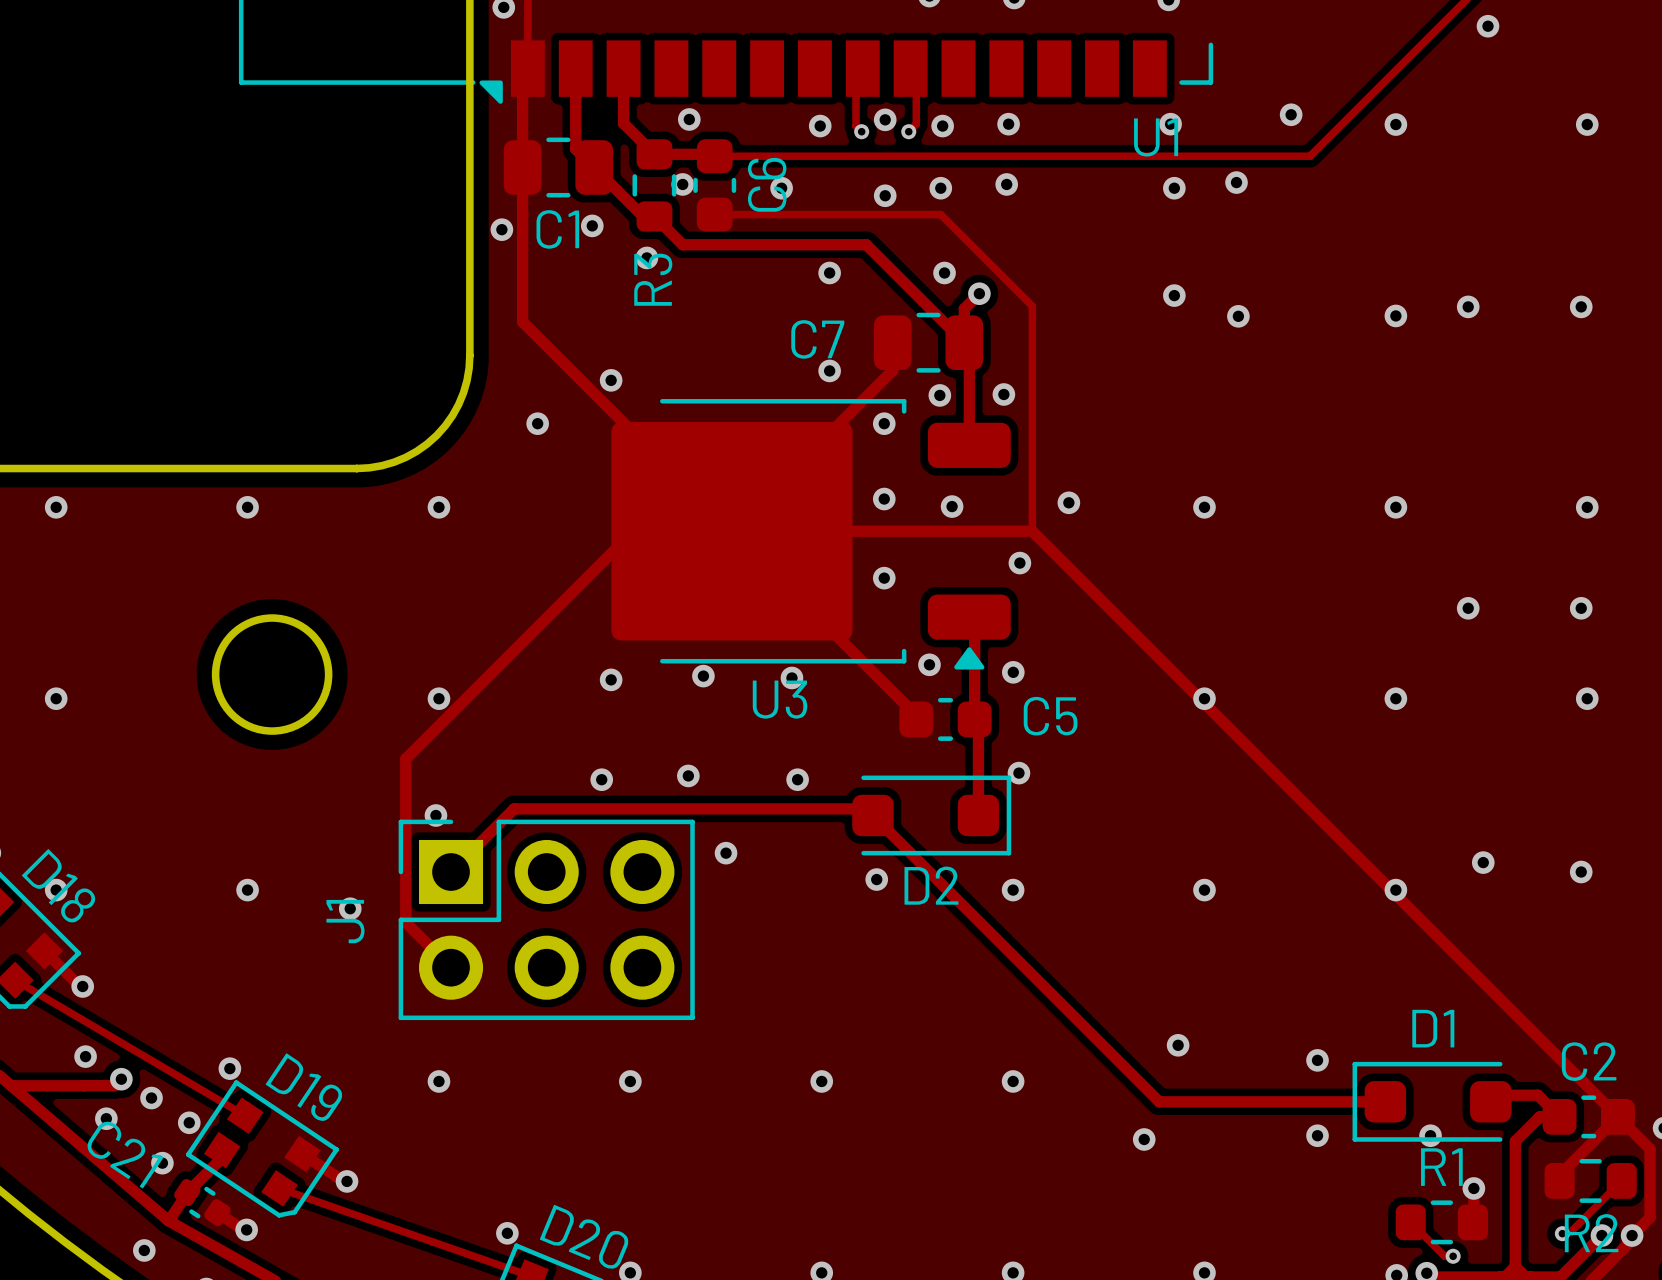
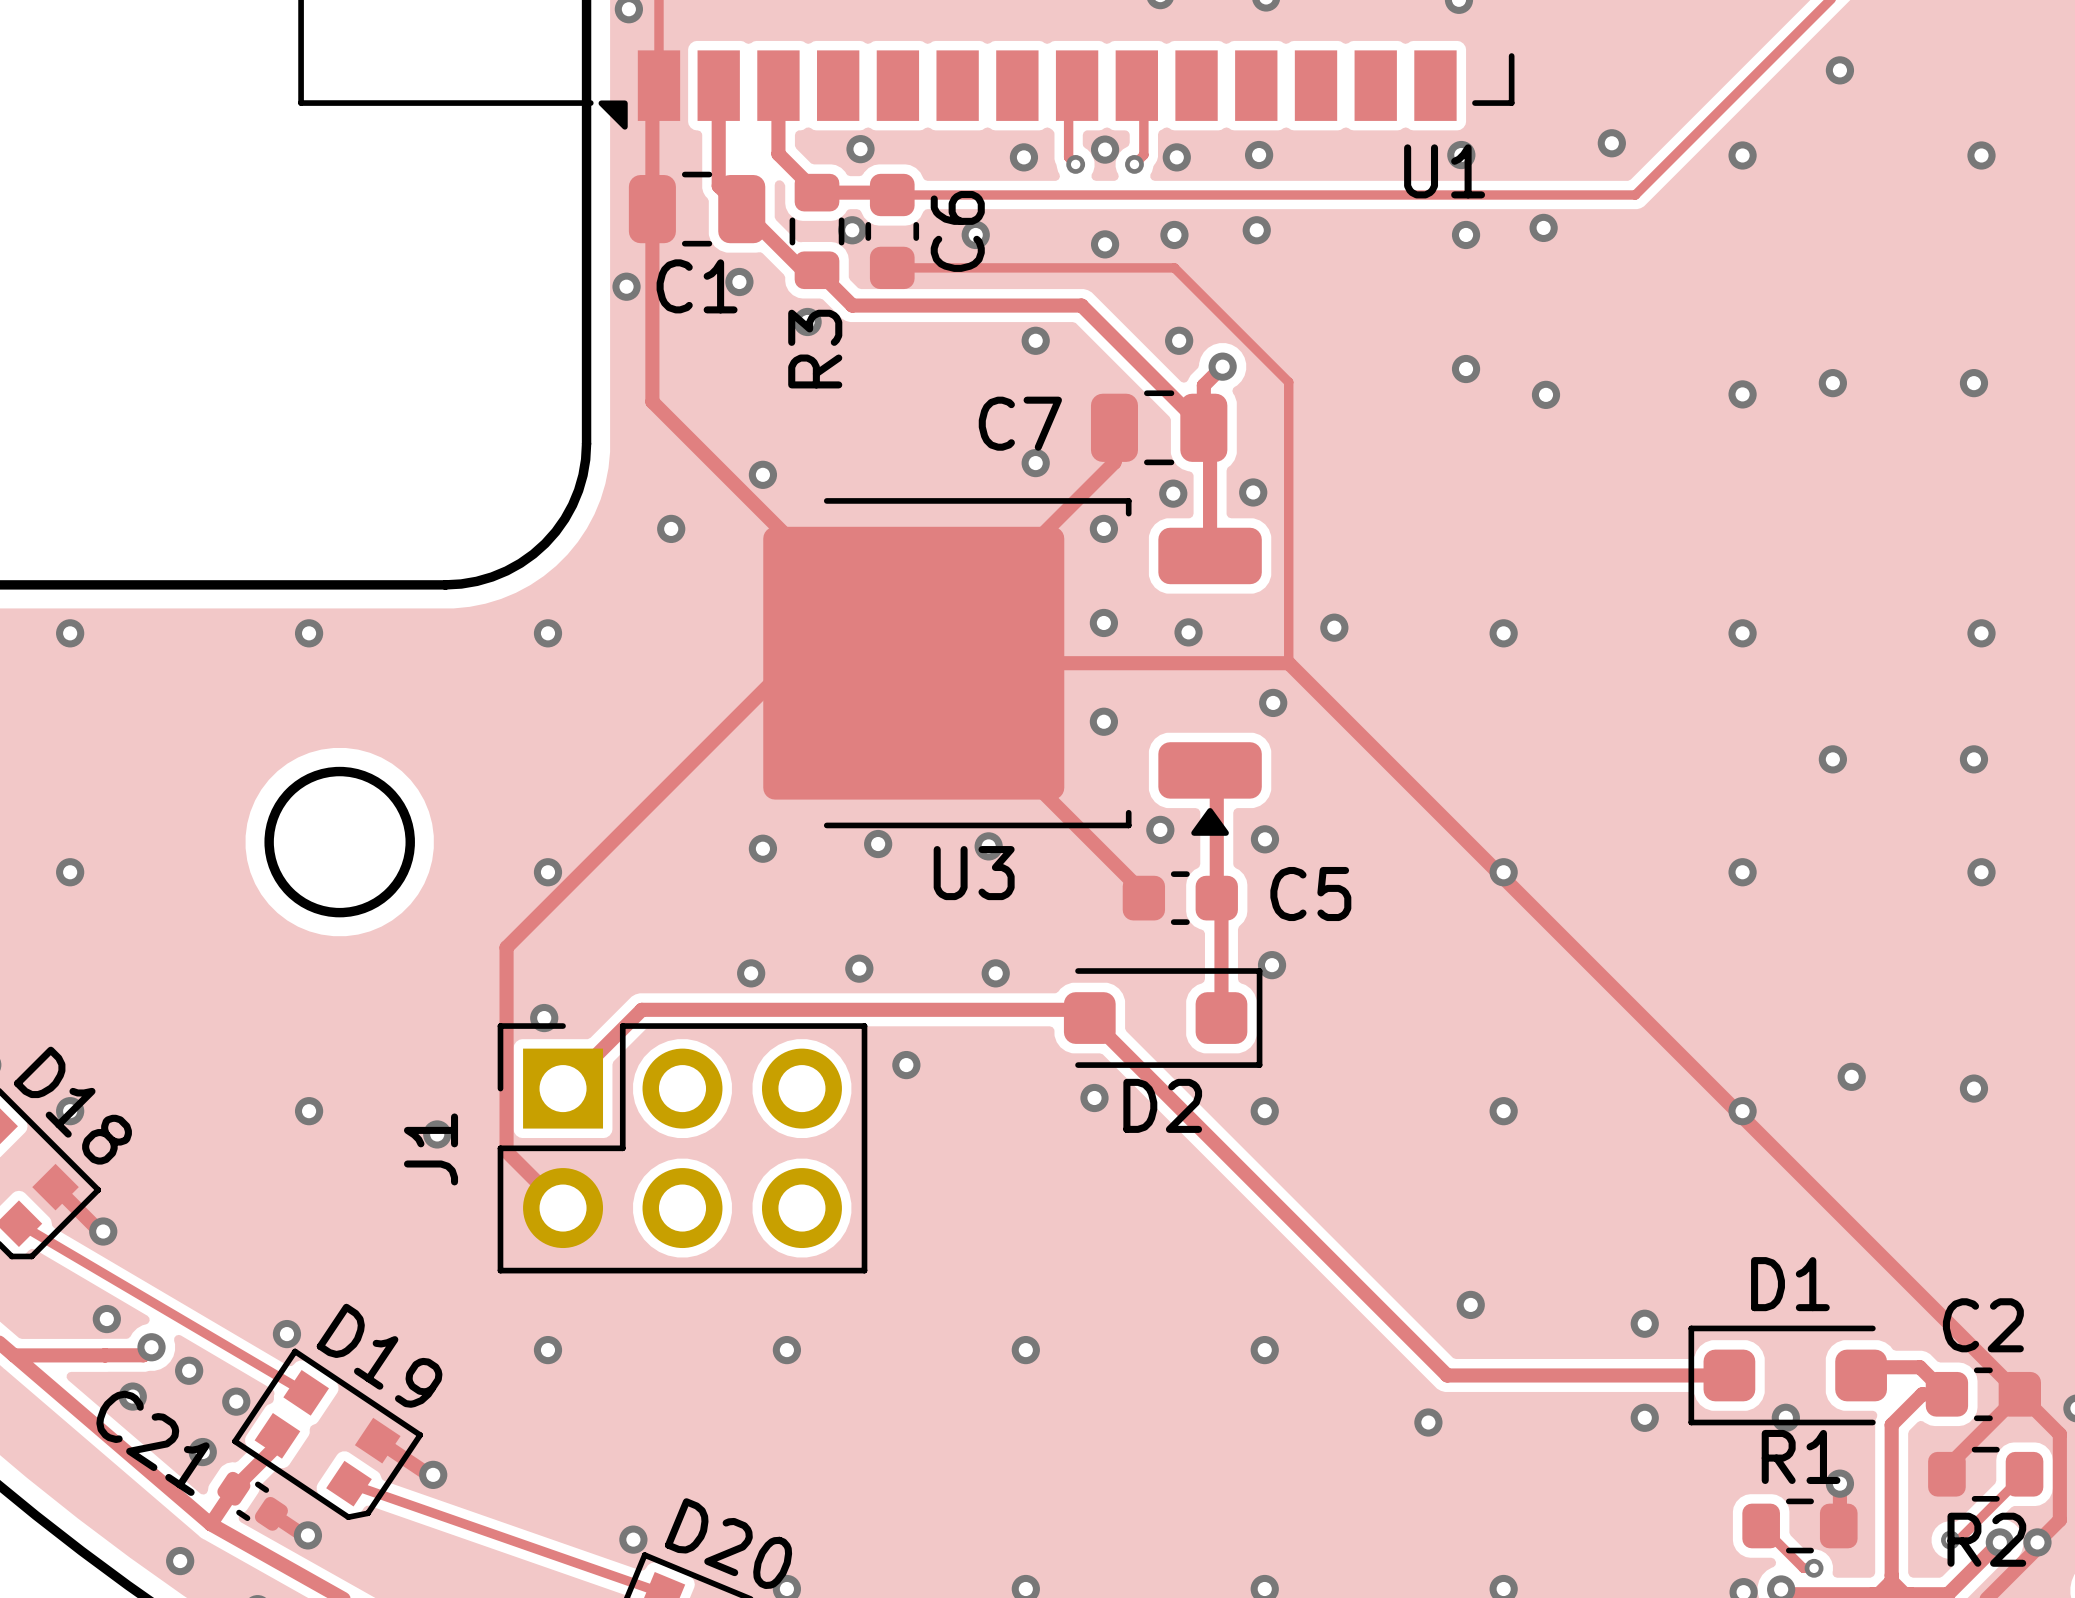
via position: (1487, 26) -> (1839, 70)

